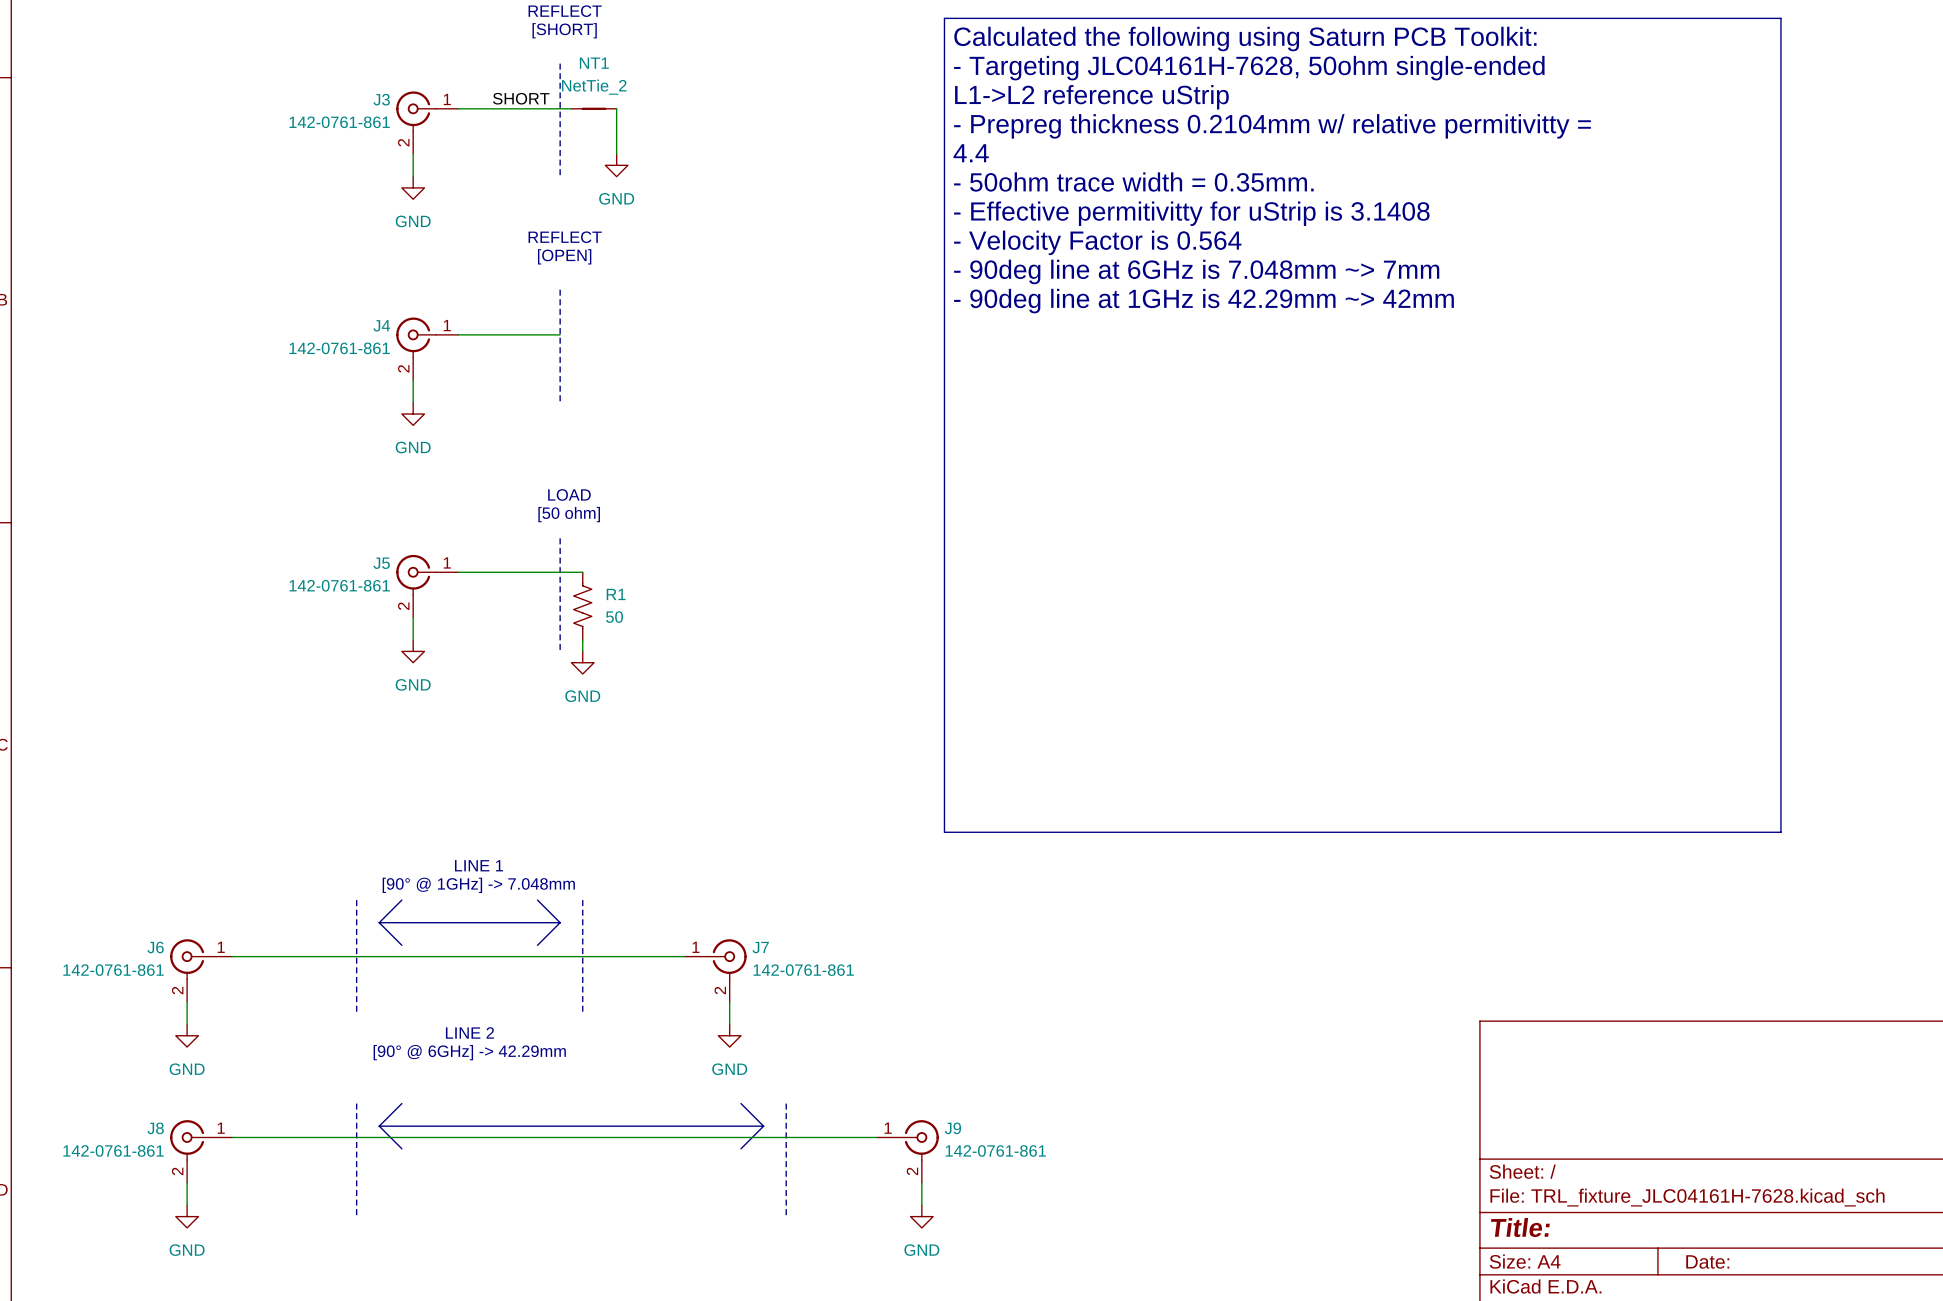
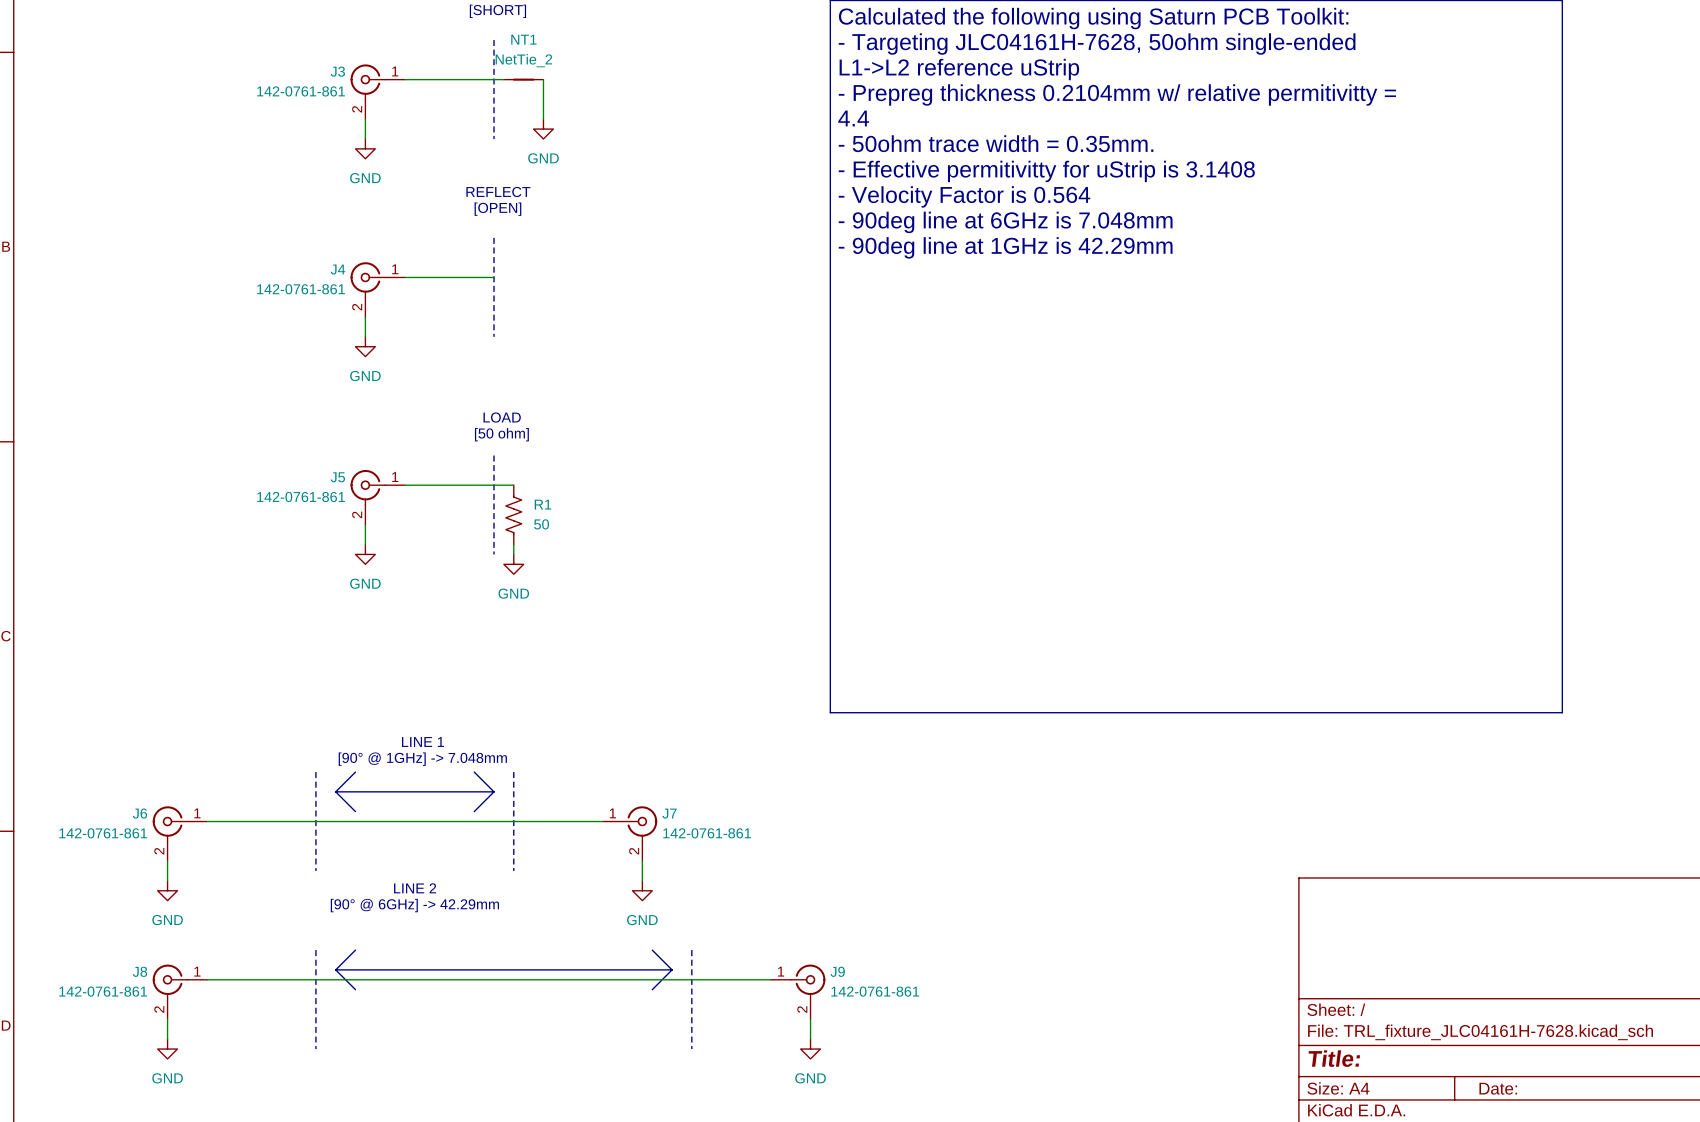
label: SHORT (521, 98) -> none
text: - 90deg line at 6GHz is 7.048mm ~> 7mm (1196, 271) -> - 90deg line at 6GHz is 7.048mm (1005, 222)
text: - 90deg line at 1GHz is 42.29mm ~> 42mm (1203, 301) -> - 90deg line at 1GHz is 42.29mm (1005, 247)

